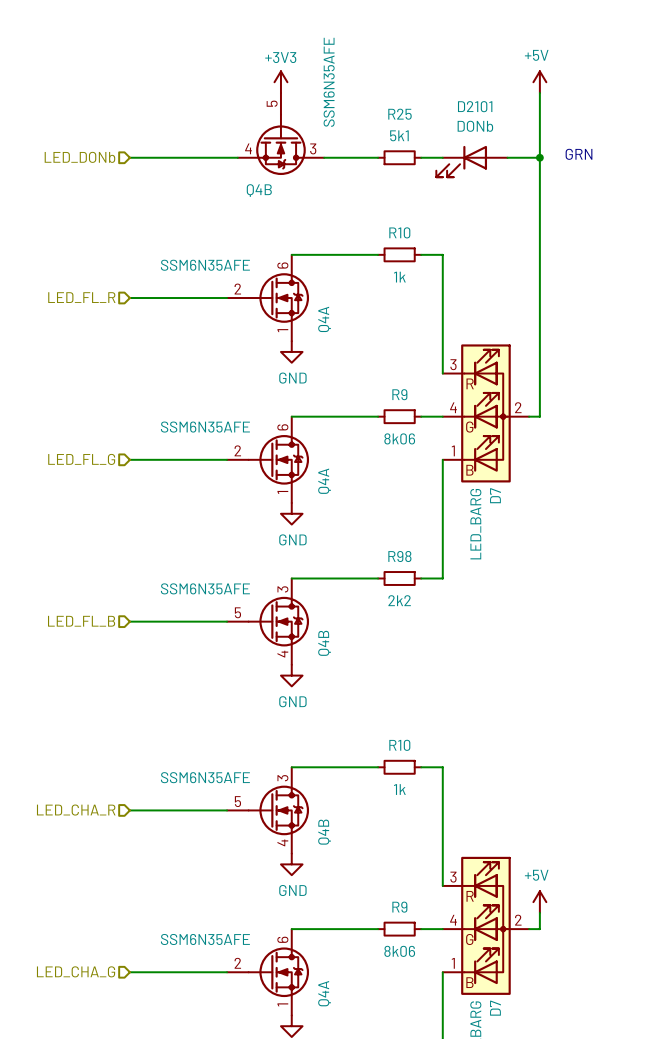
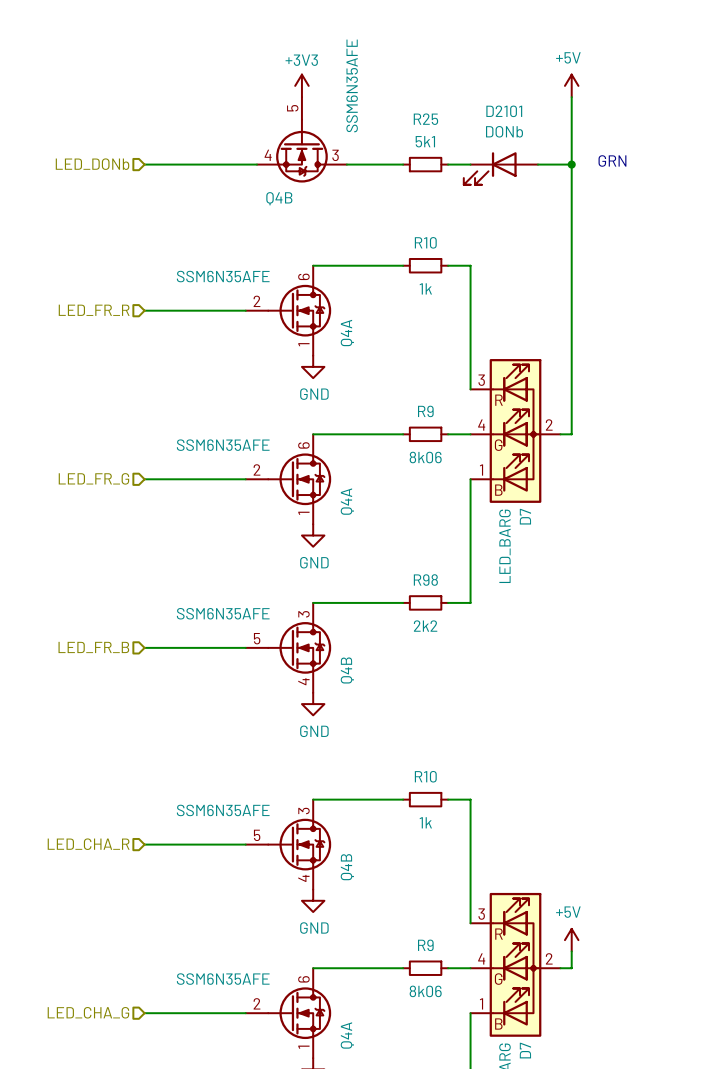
hierarchical label: LED_FL_R (81, 297) -> LED_FR_R (94, 310)
hierarchical label: LED_FL_G (81, 459) -> LED_FR_G (93, 478)
hierarchical label: LED_FL_B (81, 621) -> LED_FR_B (93, 647)

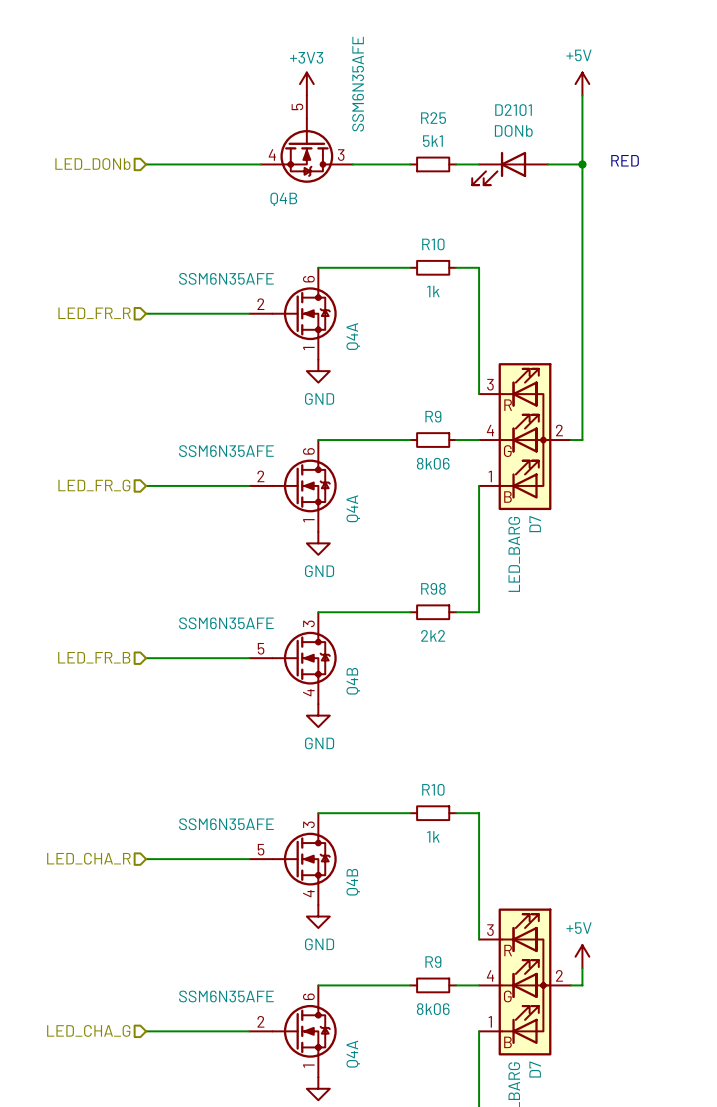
text: GRN (612, 160) -> RED (625, 160)

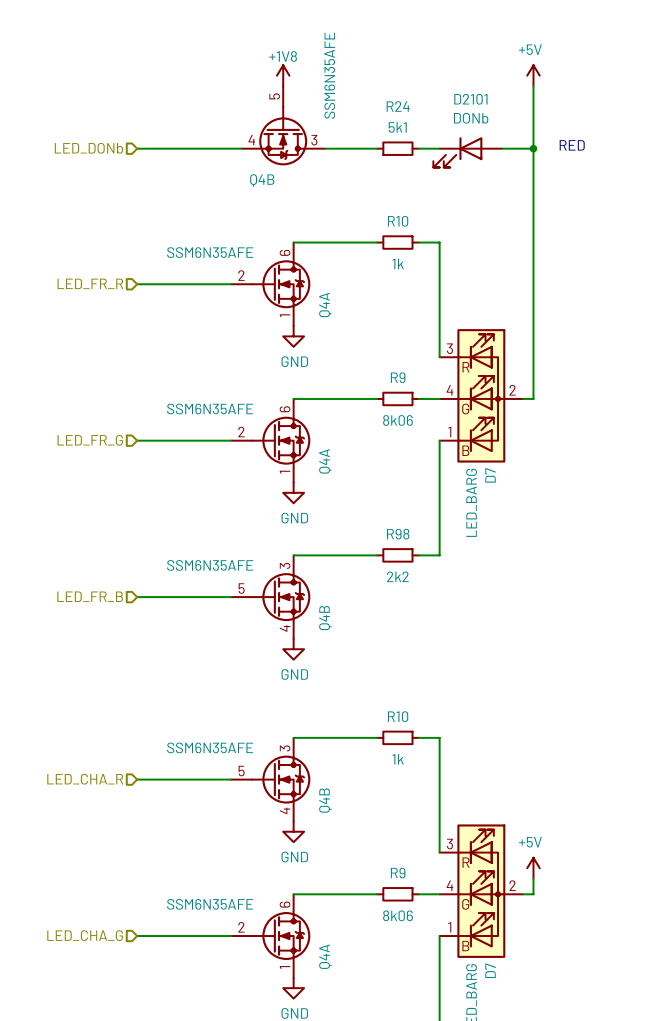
power symbol: +3V3 (306, 84) -> +1V8 (283, 75)
R25 name: R25 (433, 118) -> R24 (398, 106)

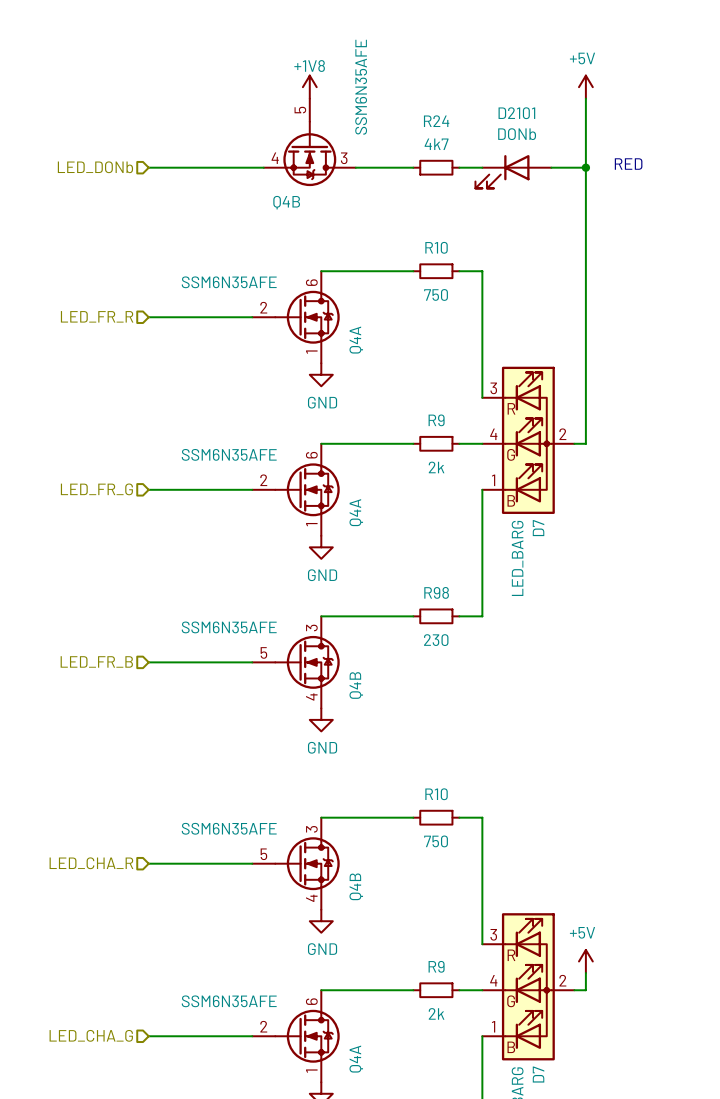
R24 value: 5k1 (397, 127) -> 4k7 (436, 144)
R10 value: 1k (398, 264) -> 750 (436, 294)
R9 value: 8k06 (397, 420) -> 2k (436, 467)
R98 value: 2k2 (397, 576) -> 230 (436, 640)
R10 value: 1k (398, 759) -> 750 (436, 841)
R9 value: 8k06 (397, 915) -> 2k (436, 1013)

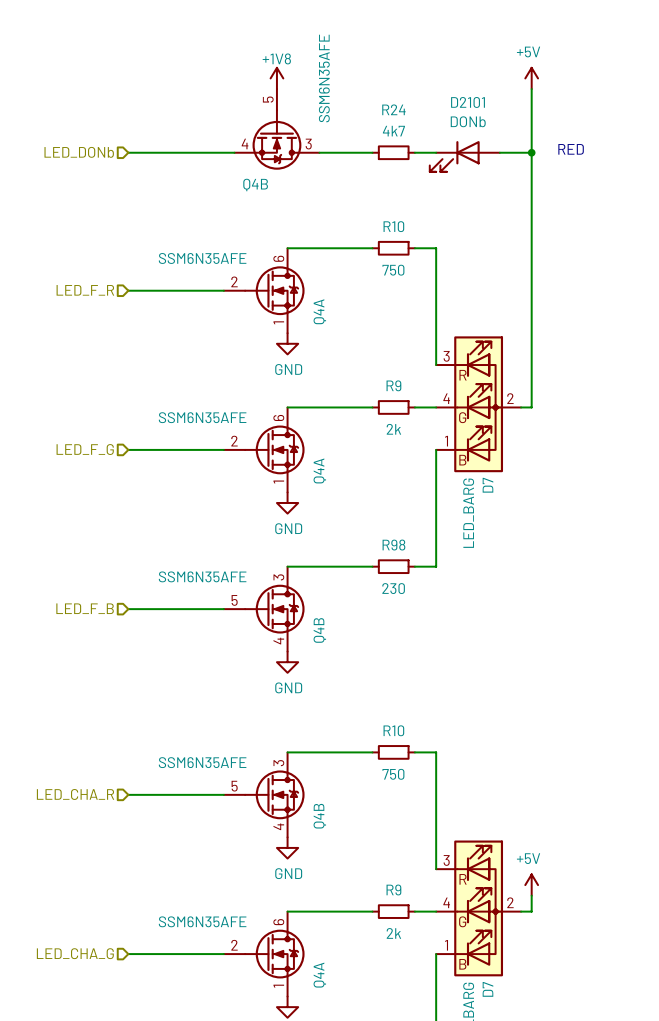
hierarchical label: LED_FR_R (97, 316) -> LED_F_R (85, 290)
hierarchical label: LED_FR_G (96, 489) -> LED_F_G (85, 449)
hierarchical label: LED_FR_B (96, 661) -> LED_F_B (85, 608)

